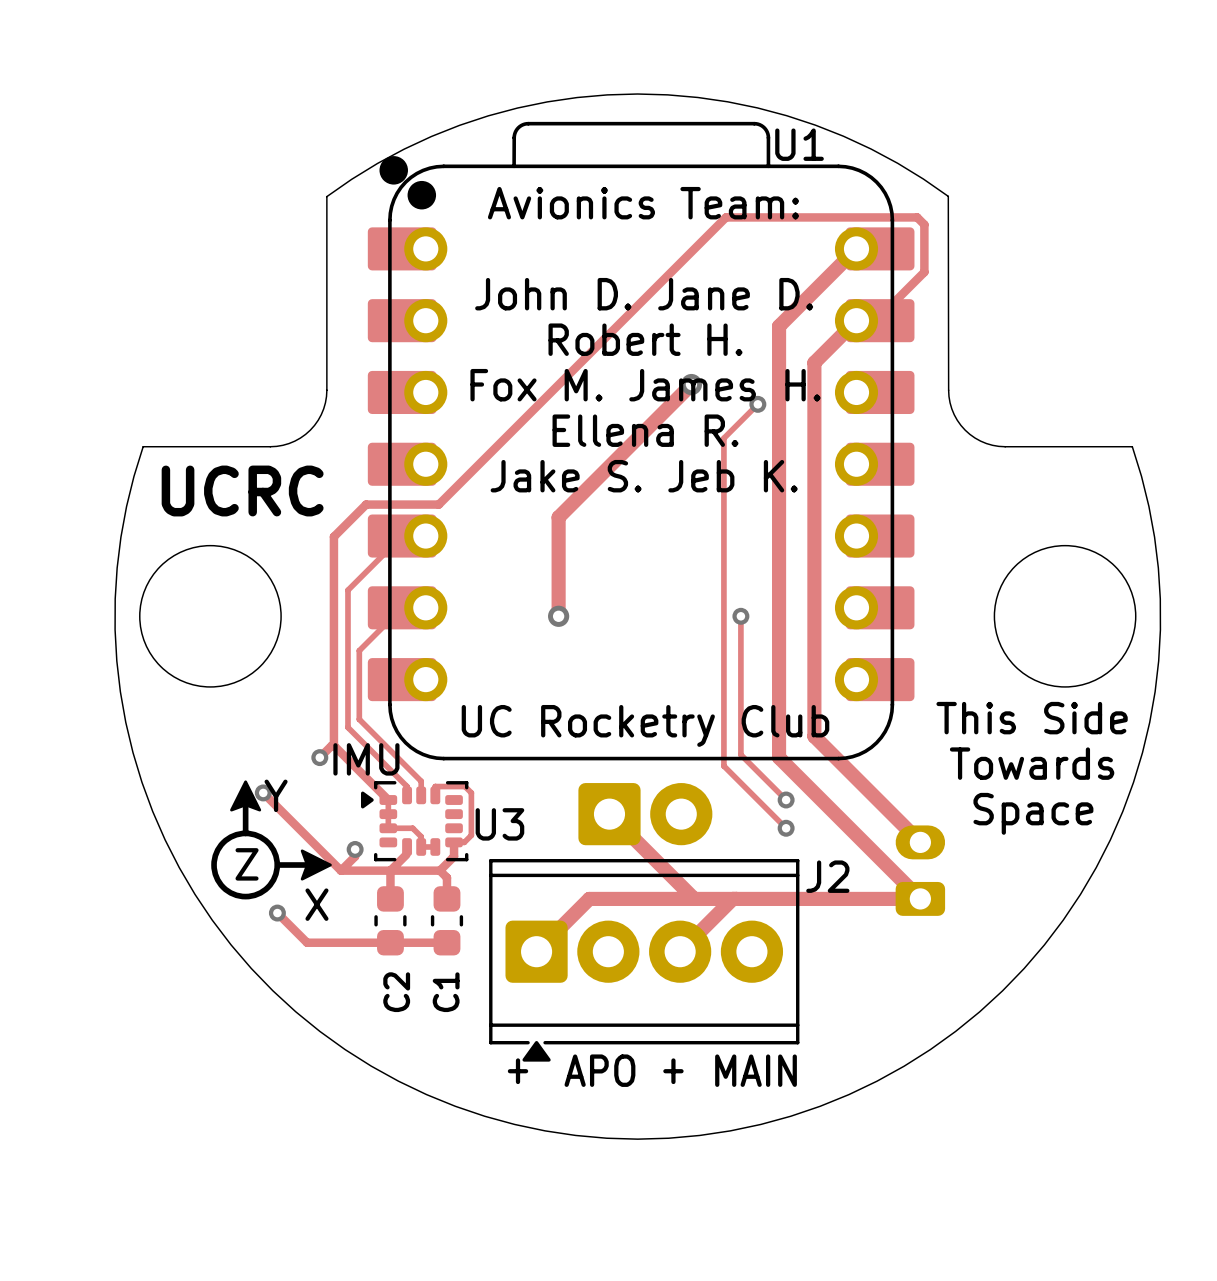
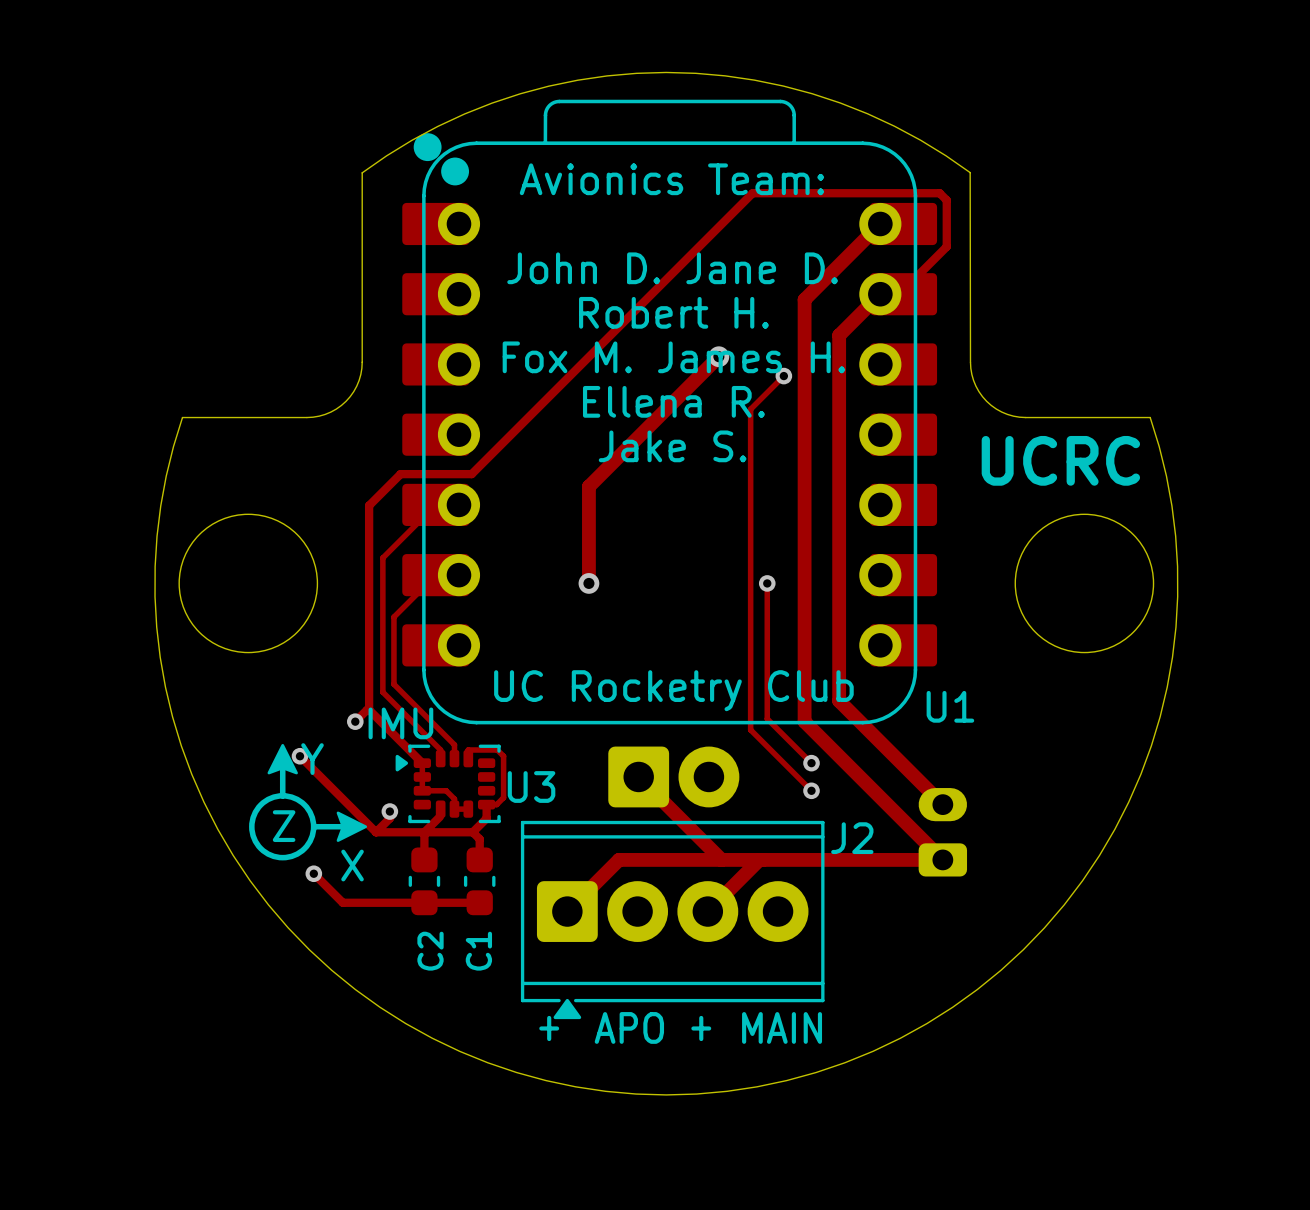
U1 name position: U1 (799, 144) -> U1 (950, 706)
text: Jake S. Jeb K. (644, 476) -> Jake S. (672, 446)
text: UCRC (242, 491) -> none
text: none -> UCRC (1060, 460)
text: This Side (1032, 718) -> none
text: Towards (1032, 763) -> none
text: Space (1033, 813) -> none

